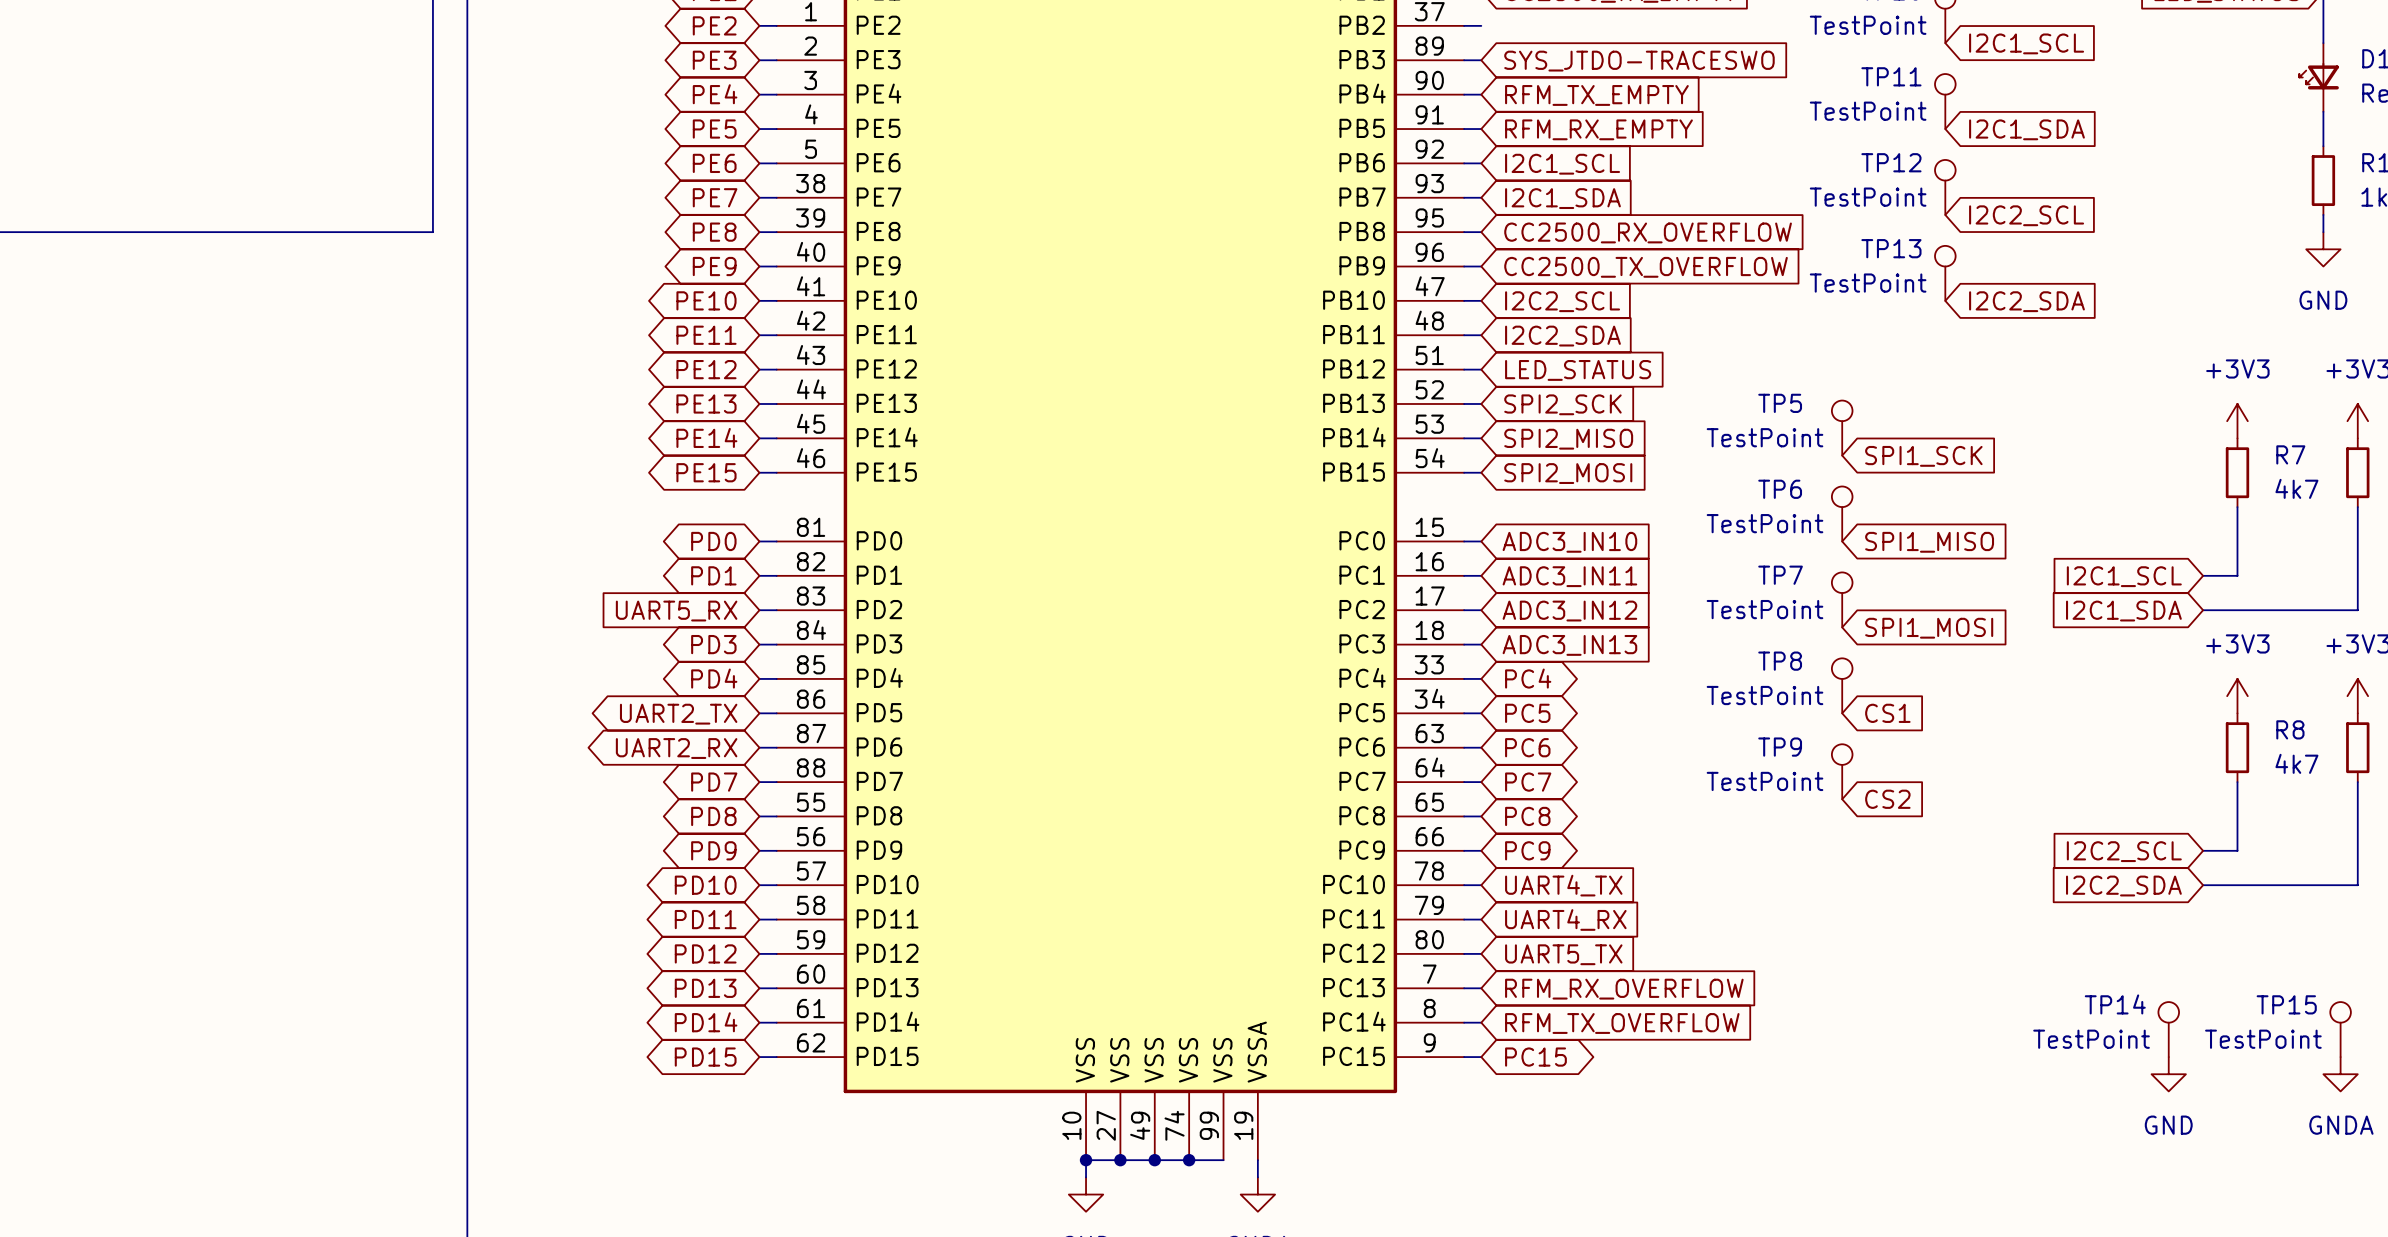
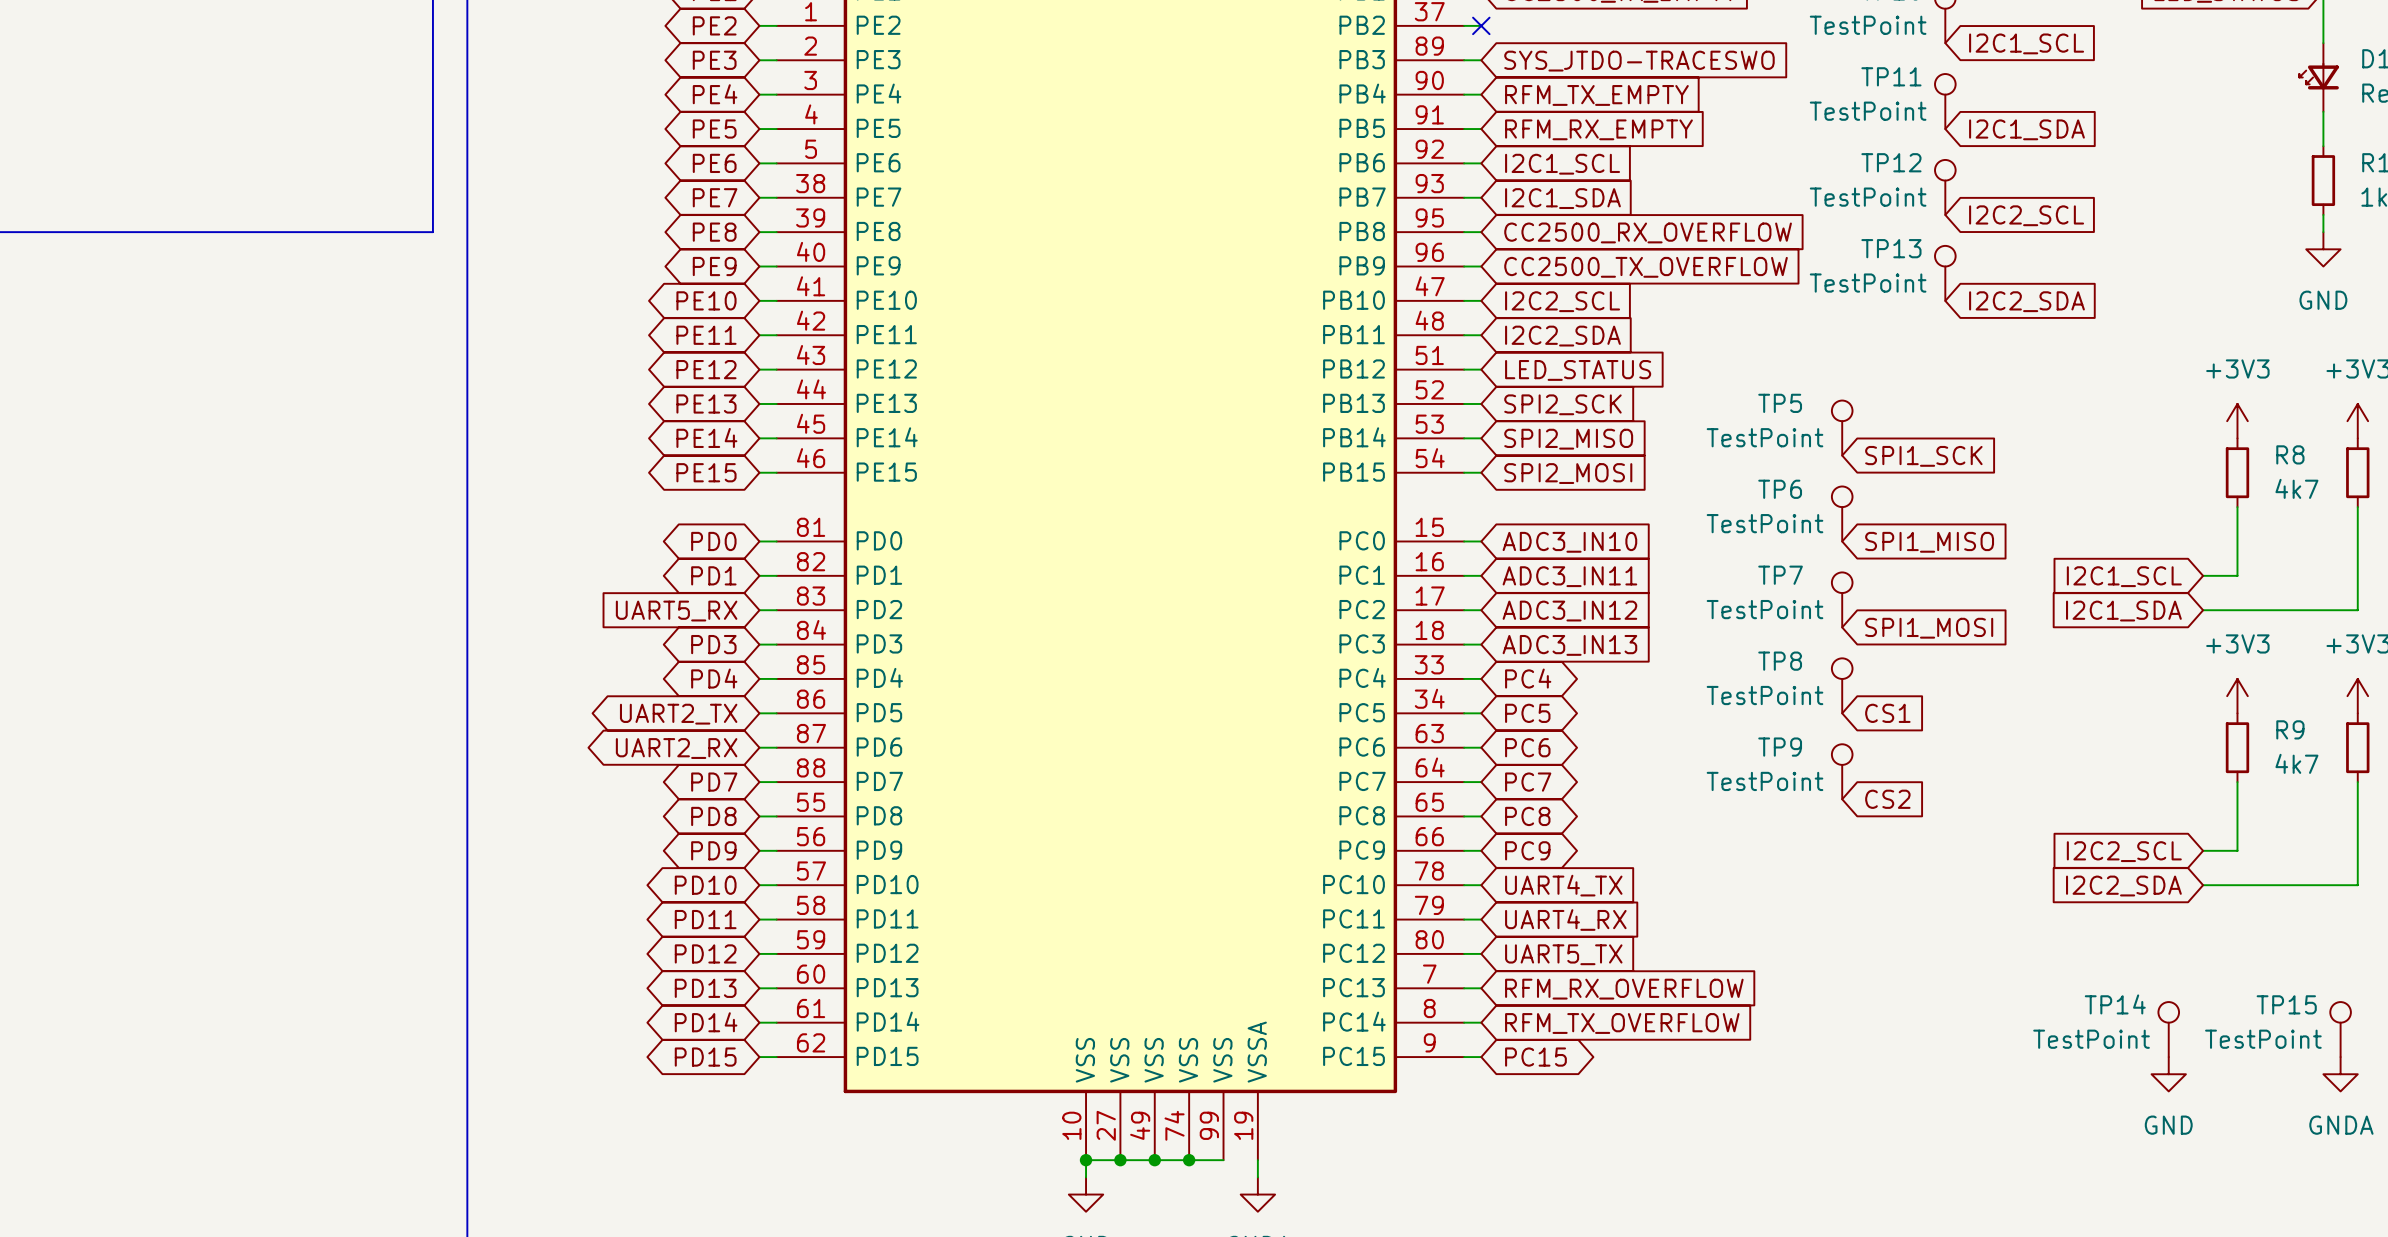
no-connect mark: none -> (1481, 25)
R7 name: R7 (2290, 454) -> R8 (2290, 454)
R8 name: R8 (2290, 729) -> R9 (2290, 729)

